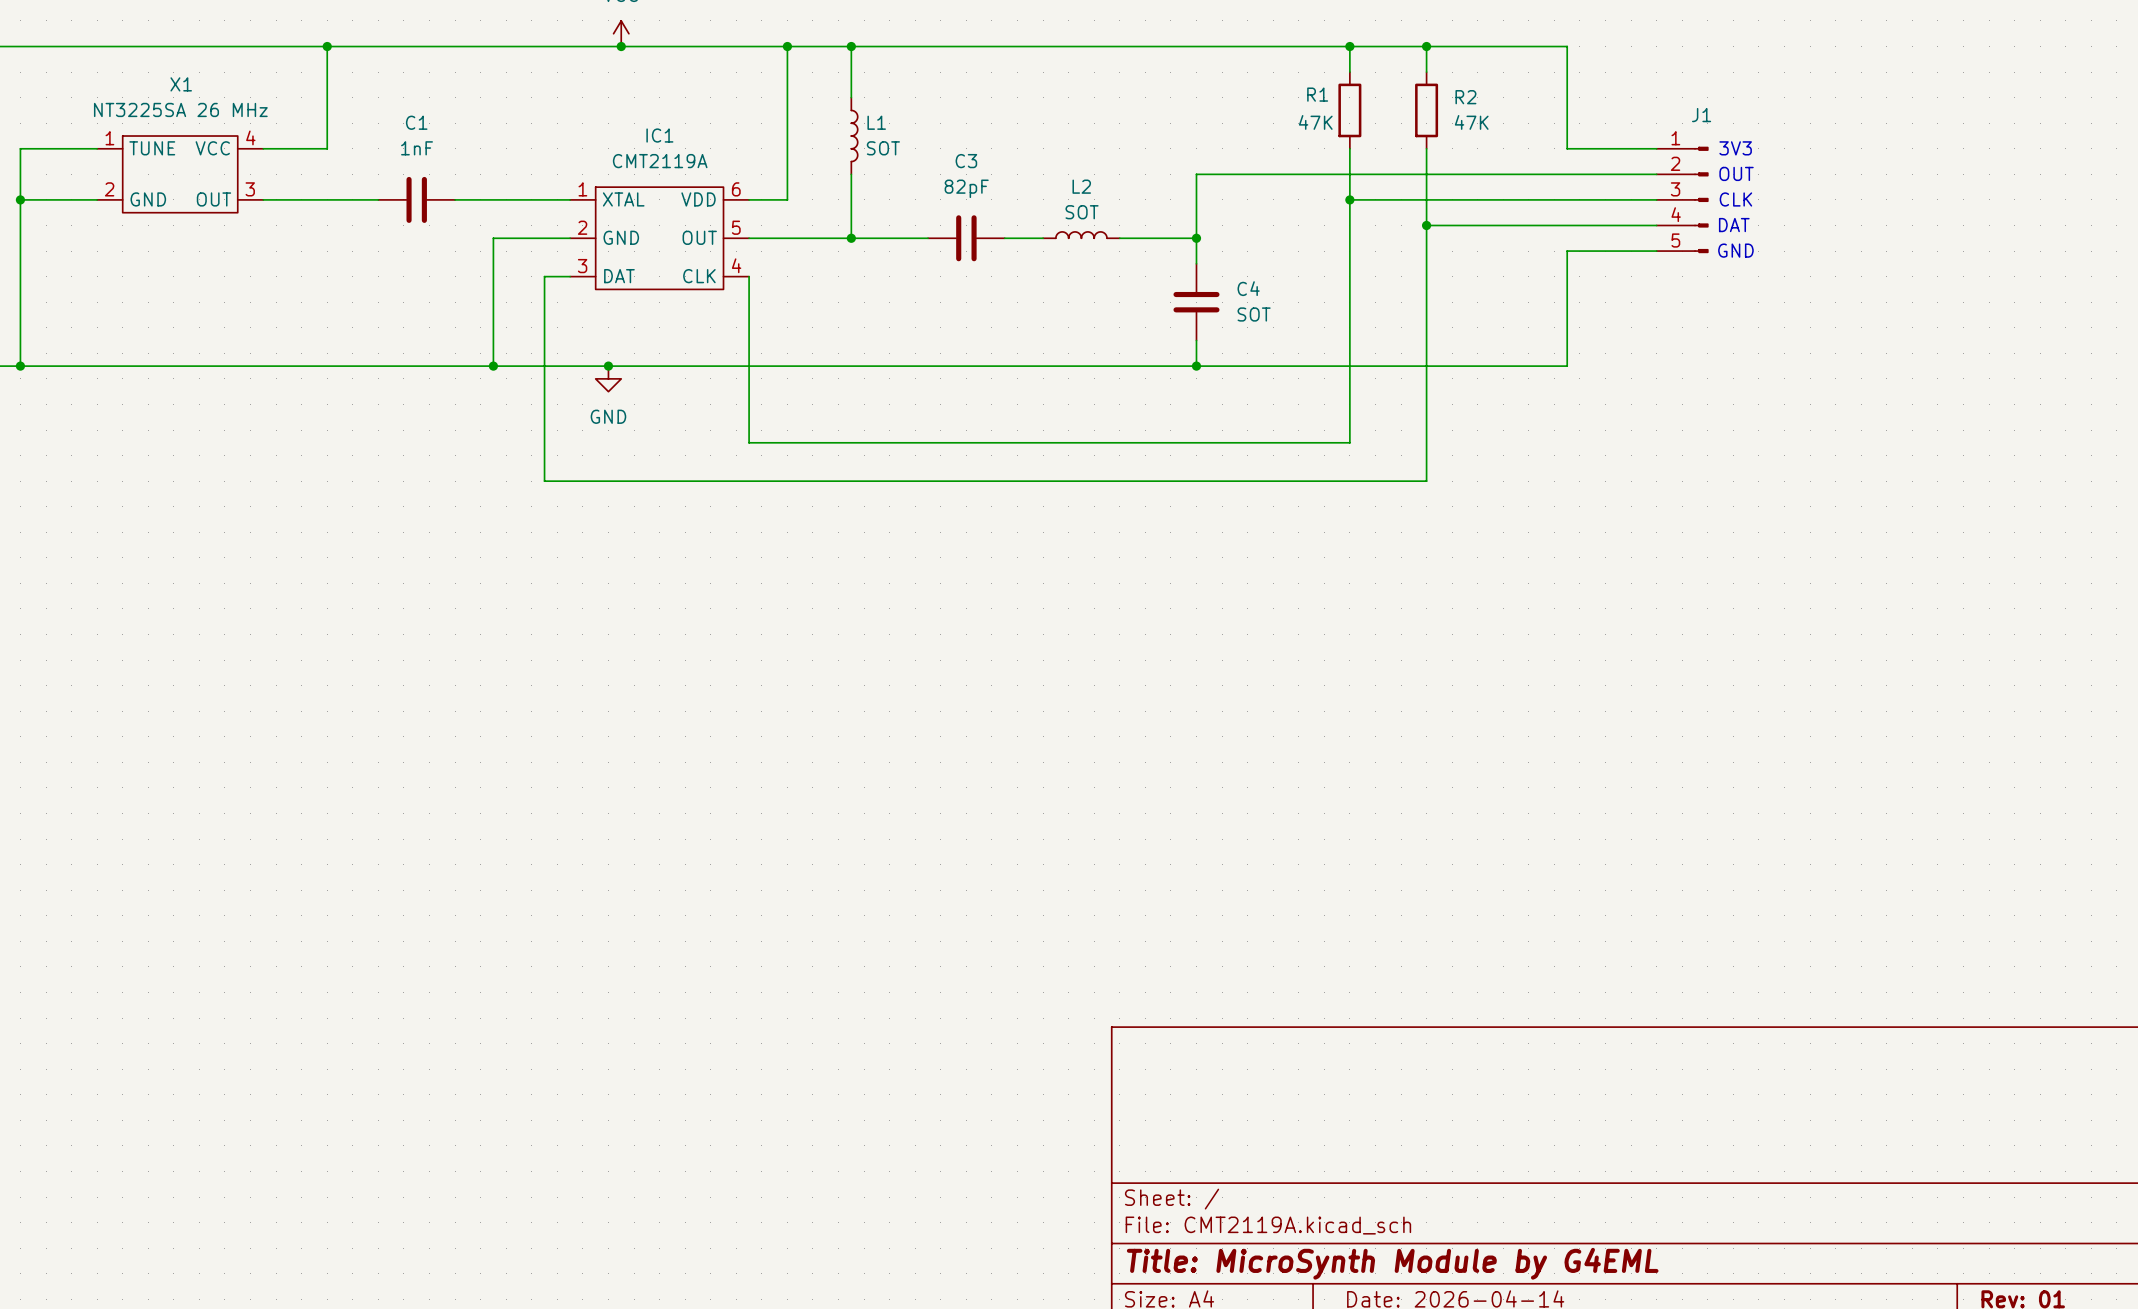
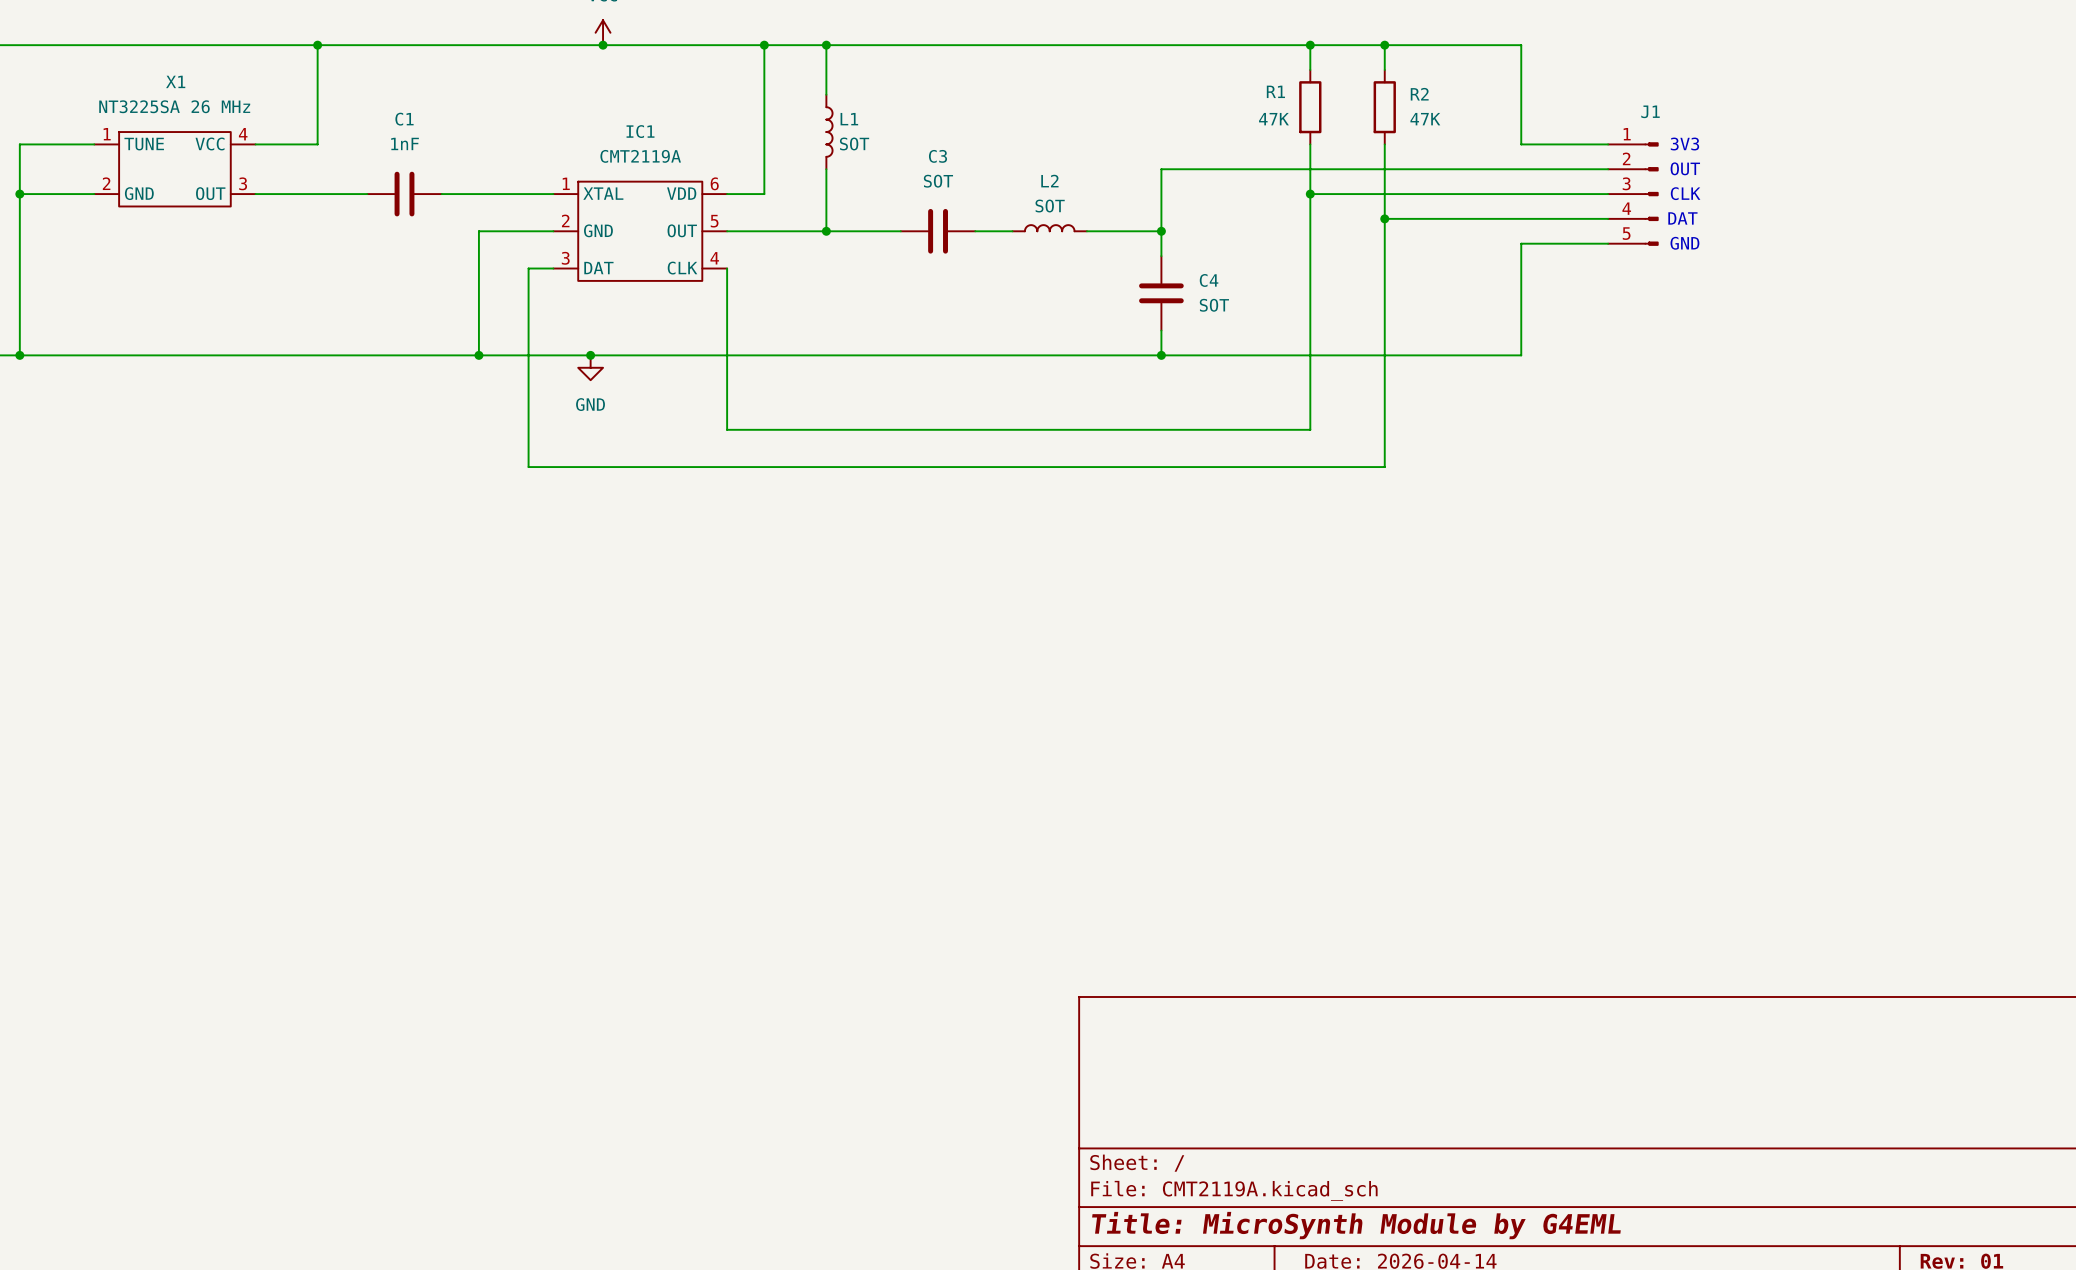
C3 value: 82pF (966, 188) -> SOT (938, 181)

